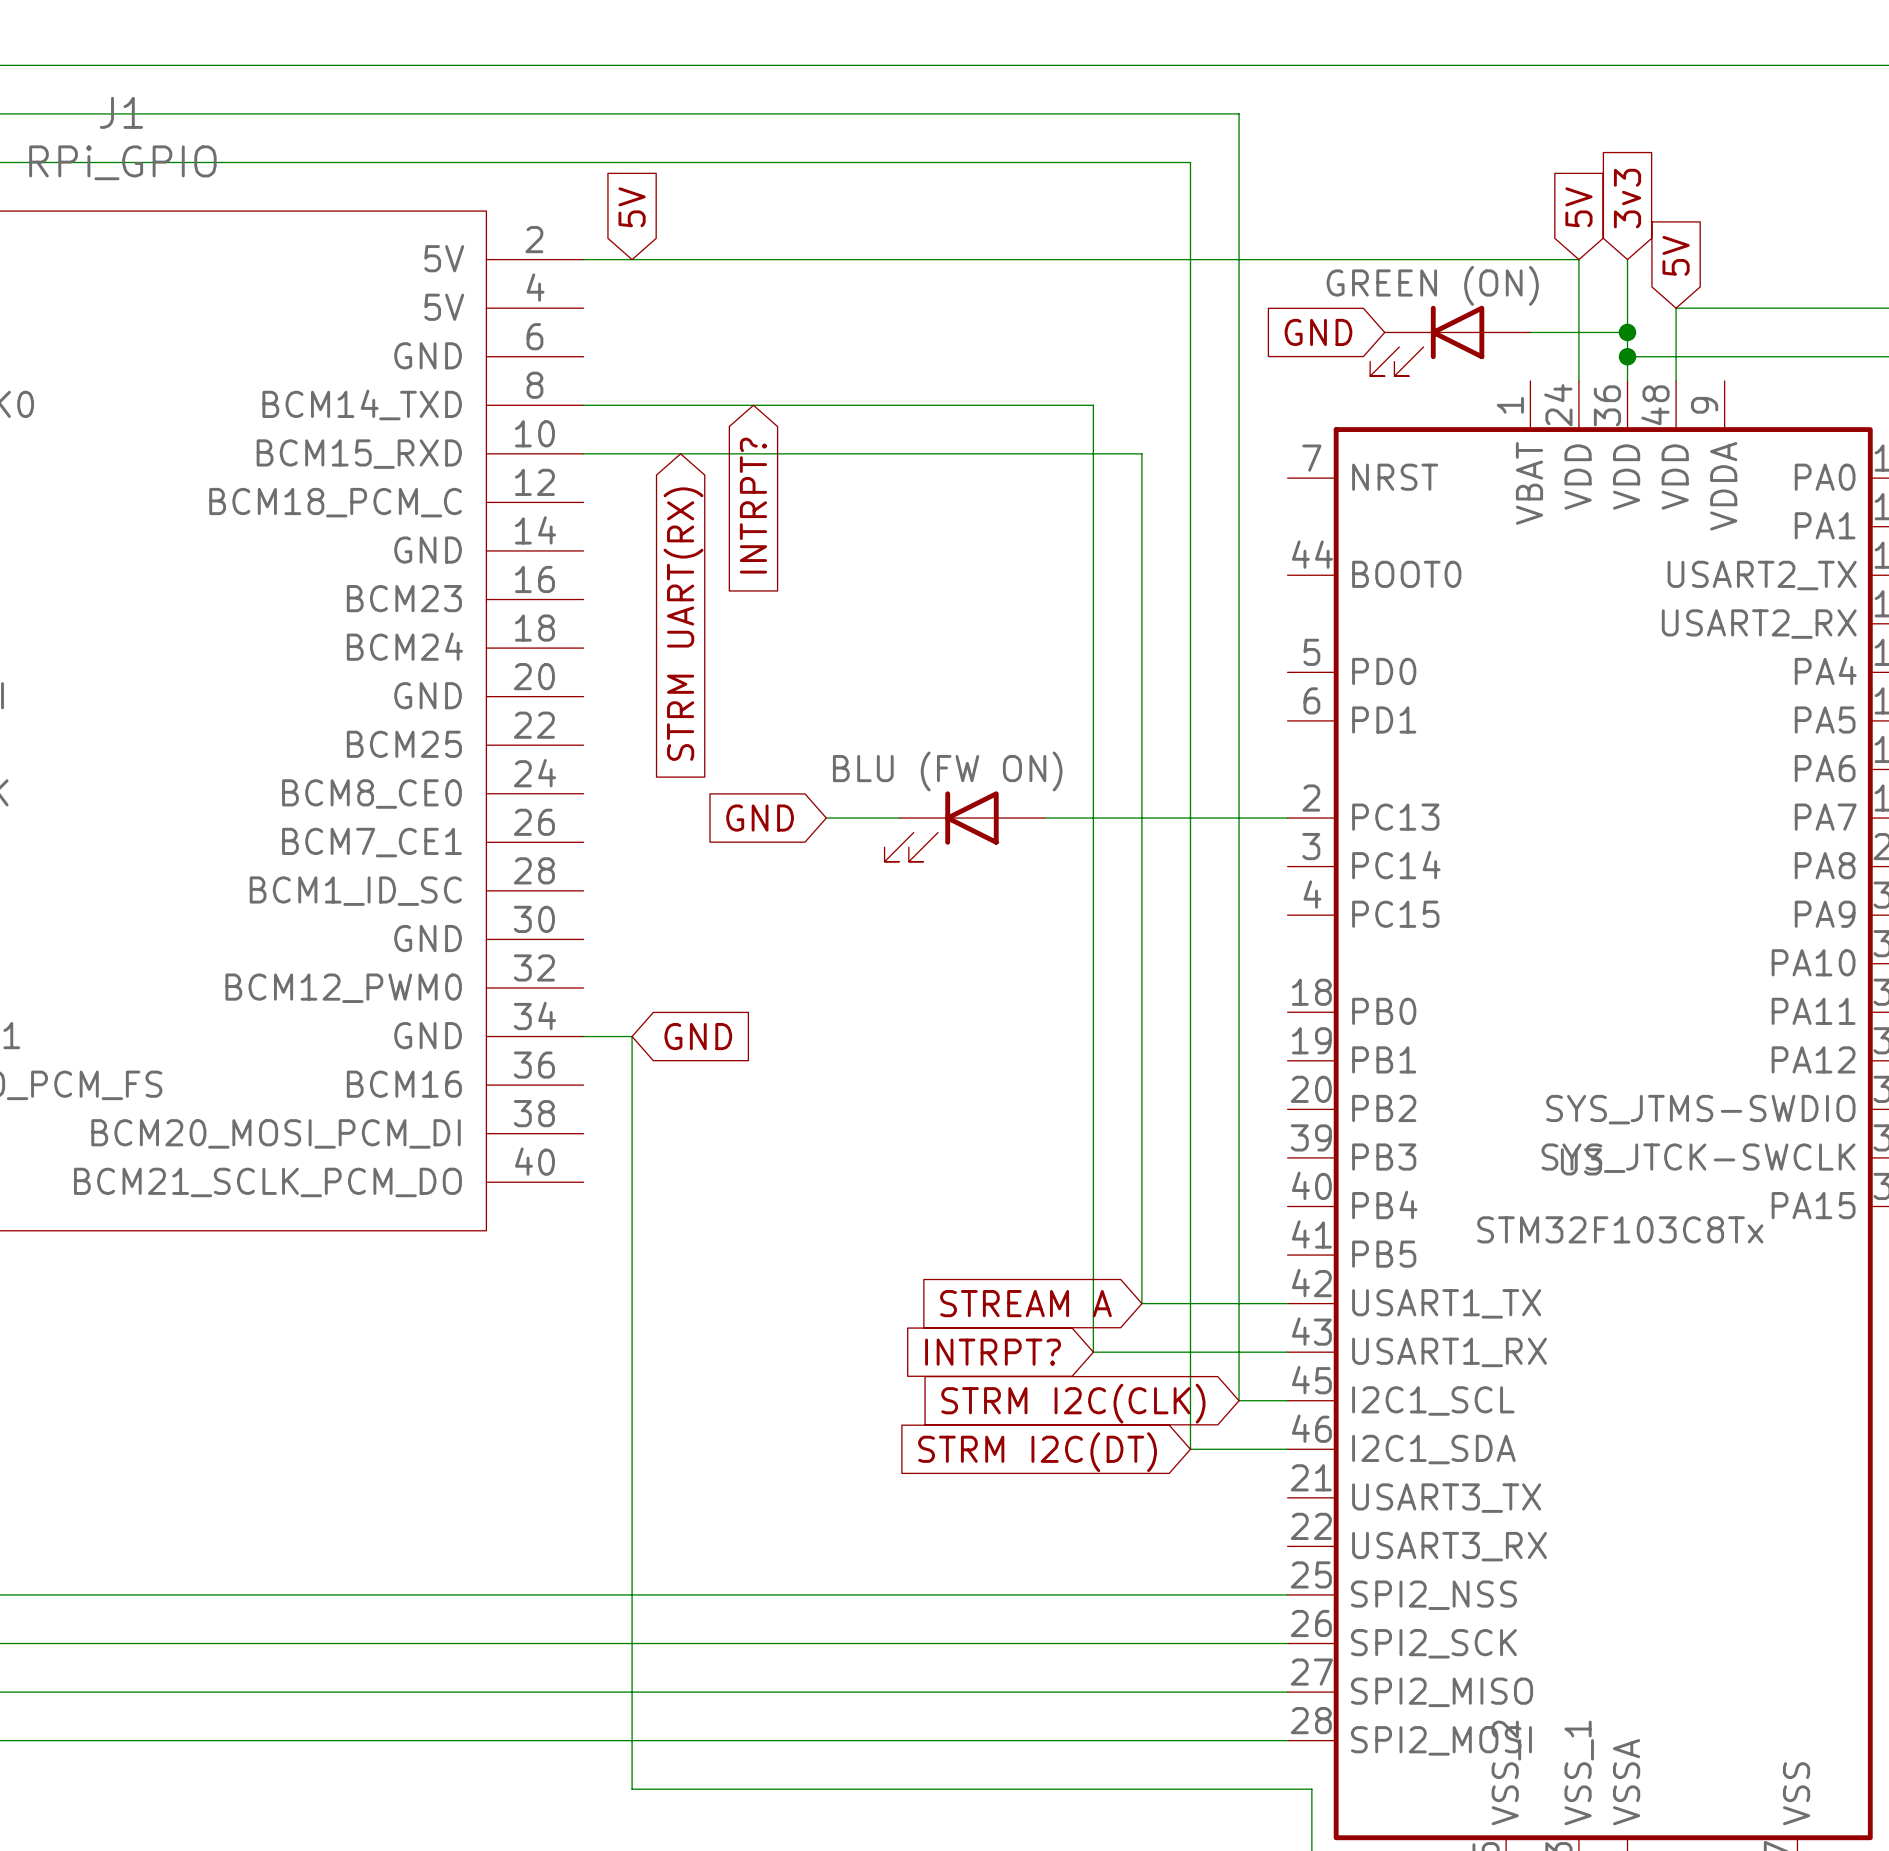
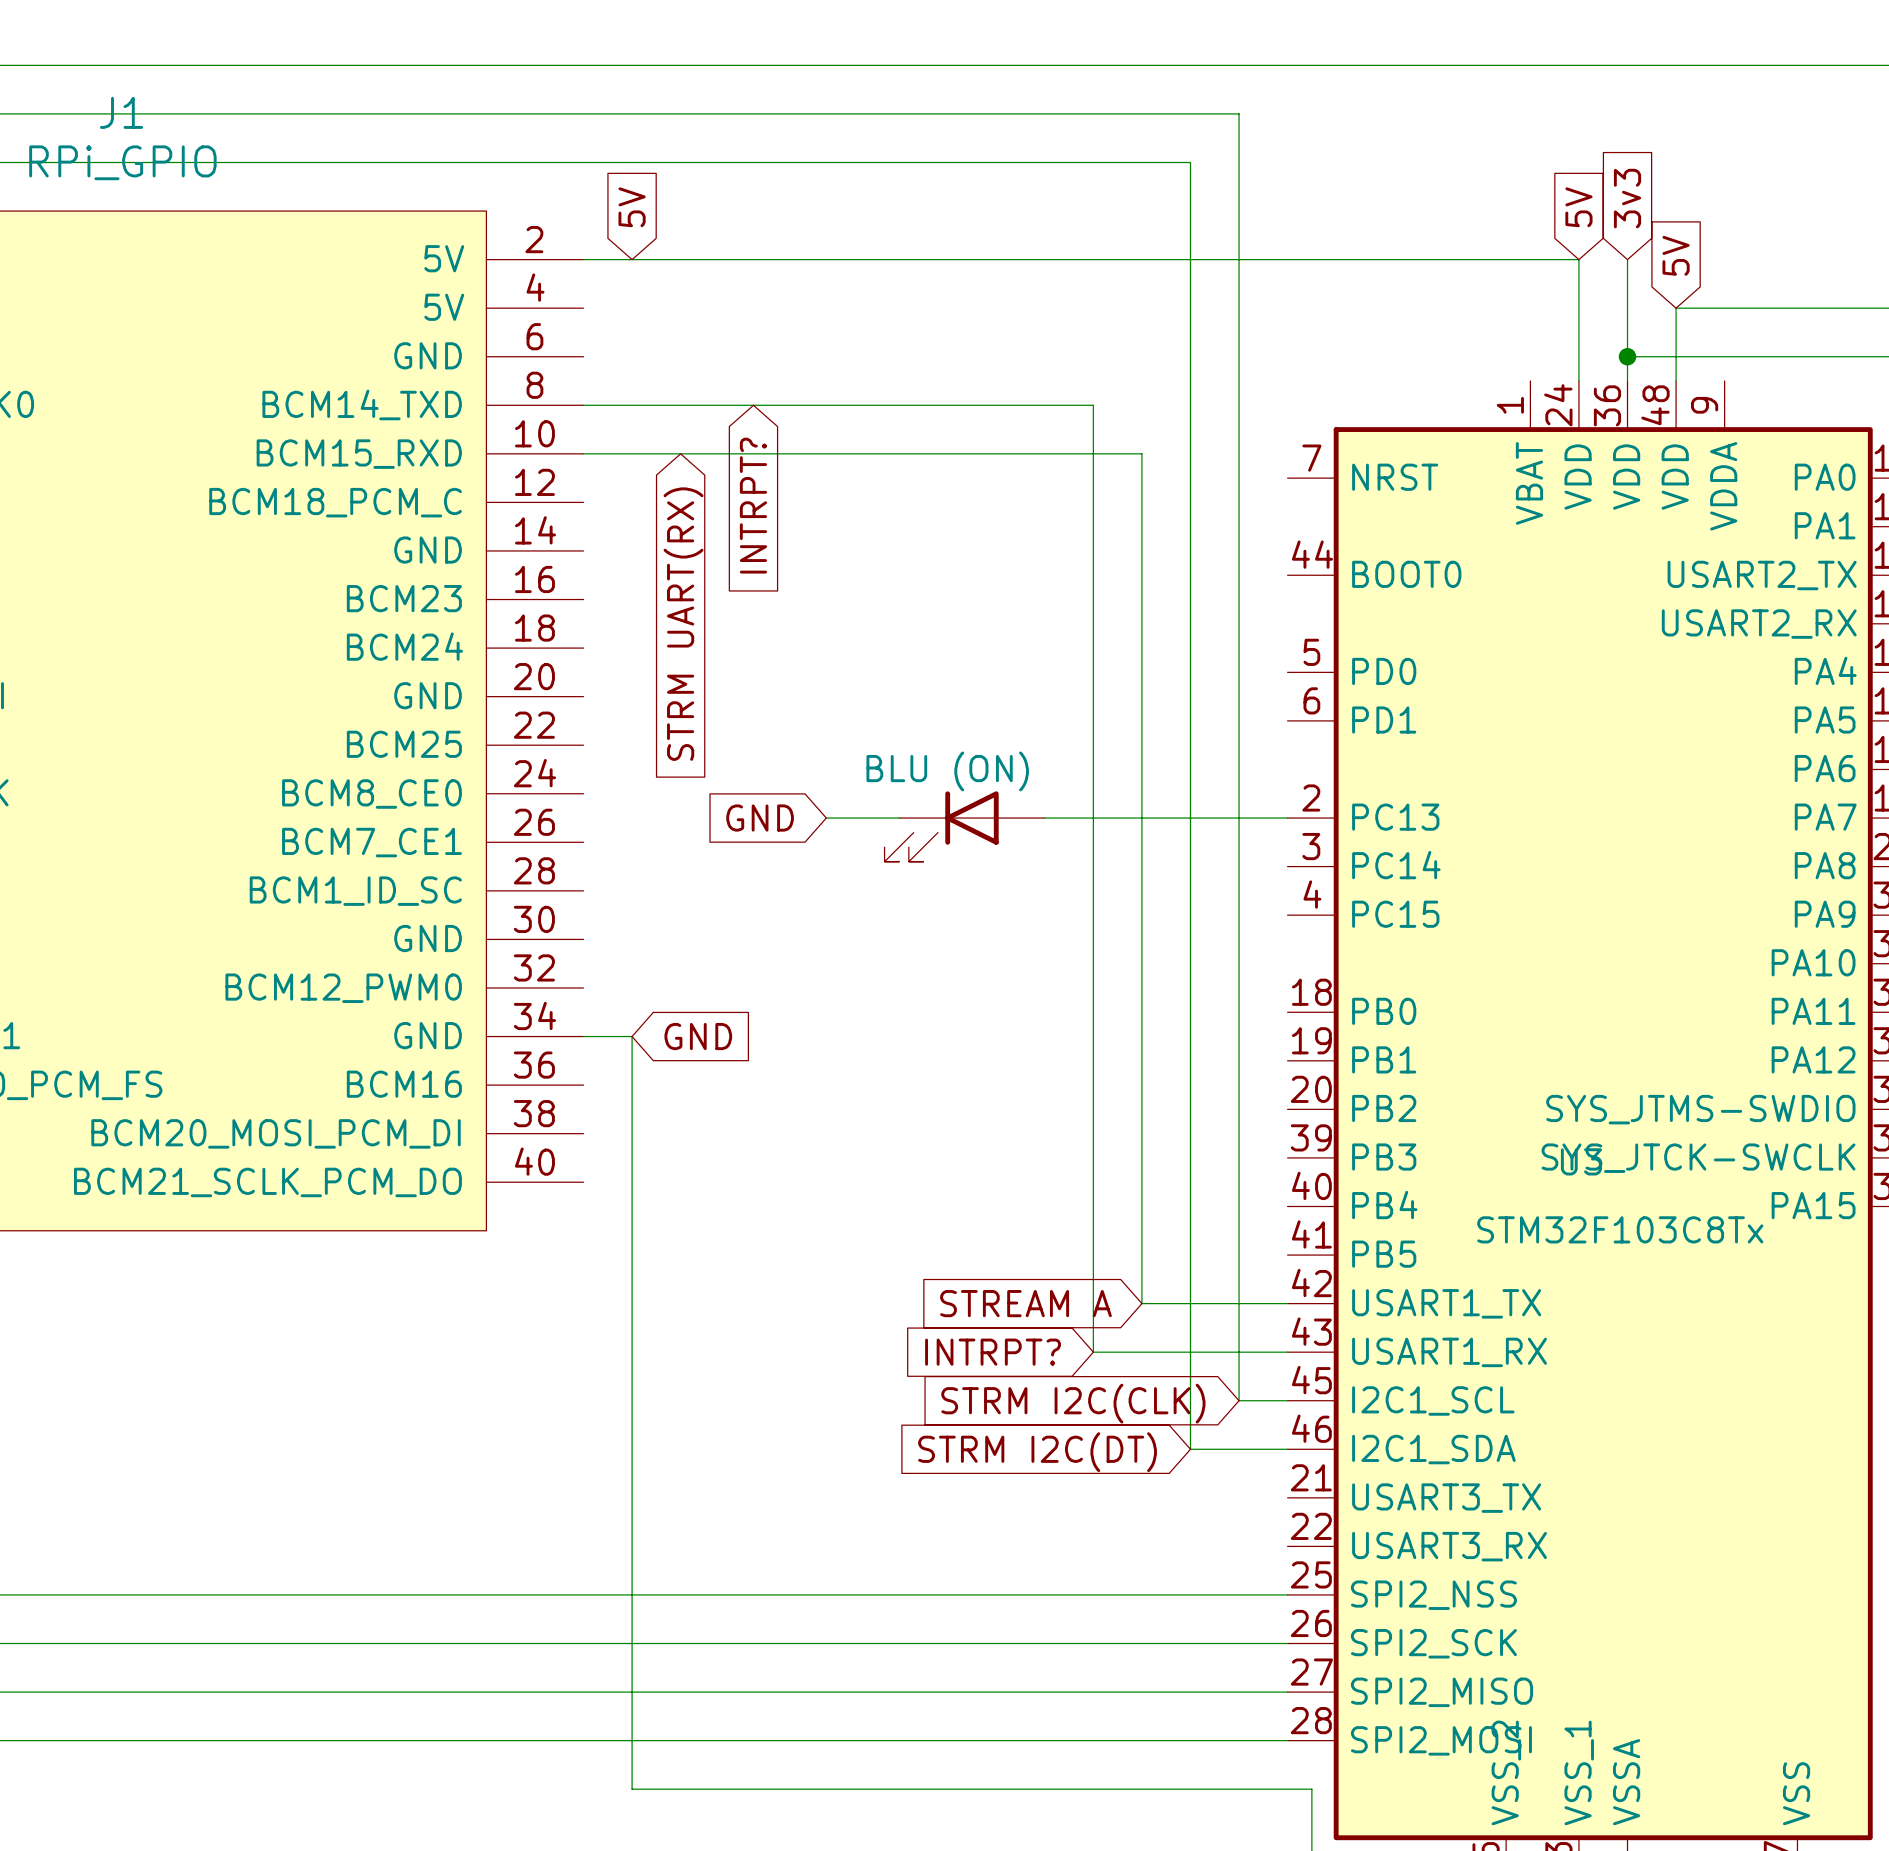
global label: GND (1318, 332) -> none
wire: (1530, 332) (1627, 332) -> none
junction: (1627, 332) -> none
part: GREEN (ON) (1450, 340) -> none
part value: BLU (FW ON) (947, 771) -> BLU (ON) (947, 771)

